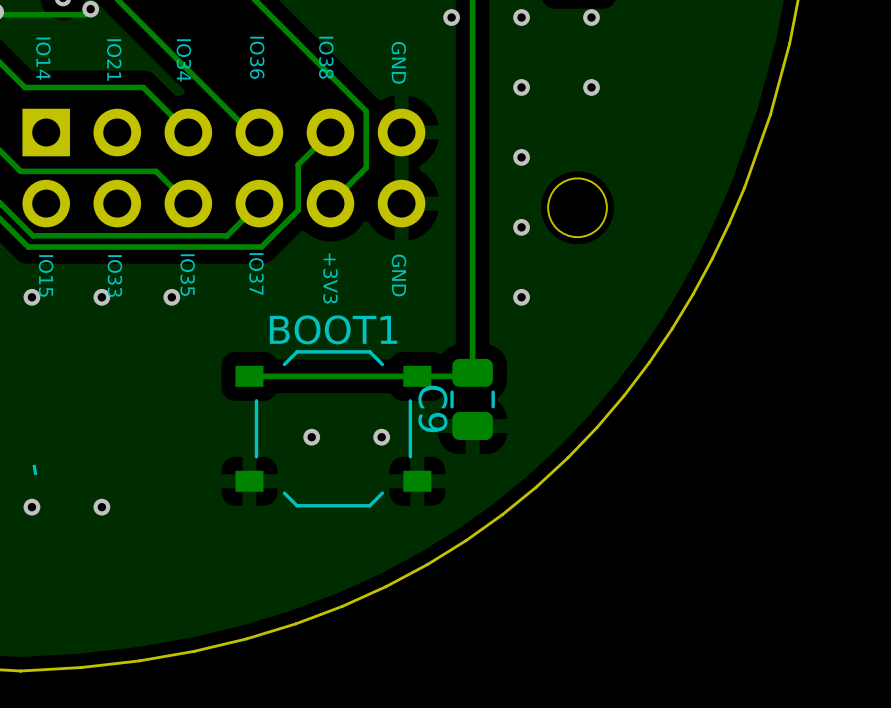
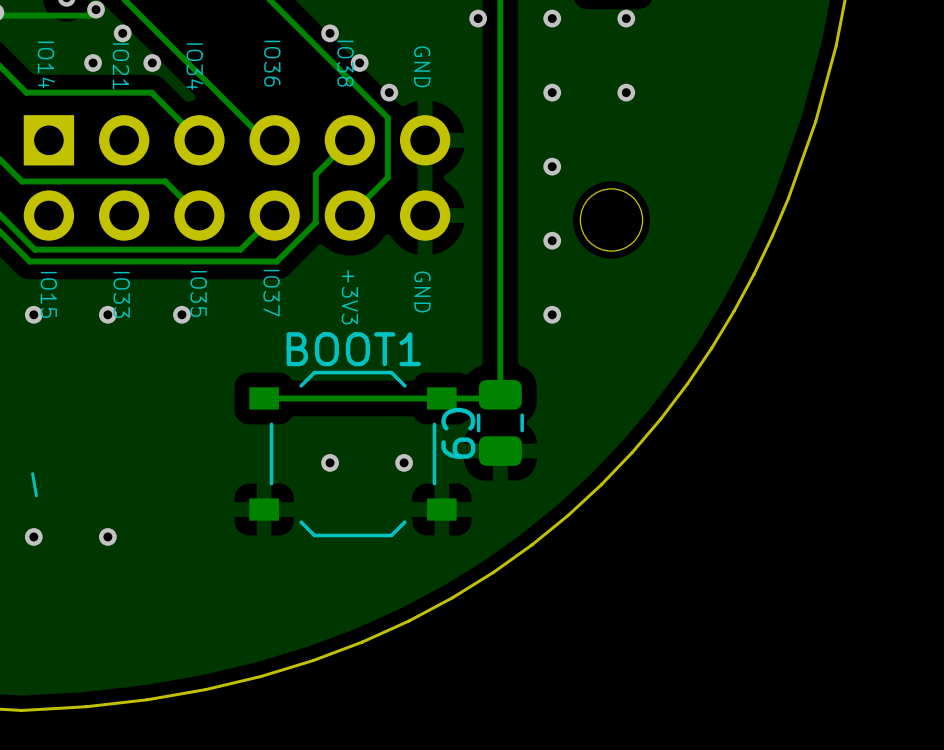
via: none -> (122, 33)
via: none -> (330, 33)
via: none -> (93, 62)
via: none -> (152, 62)
via: none -> (359, 62)
via: none -> (389, 92)

